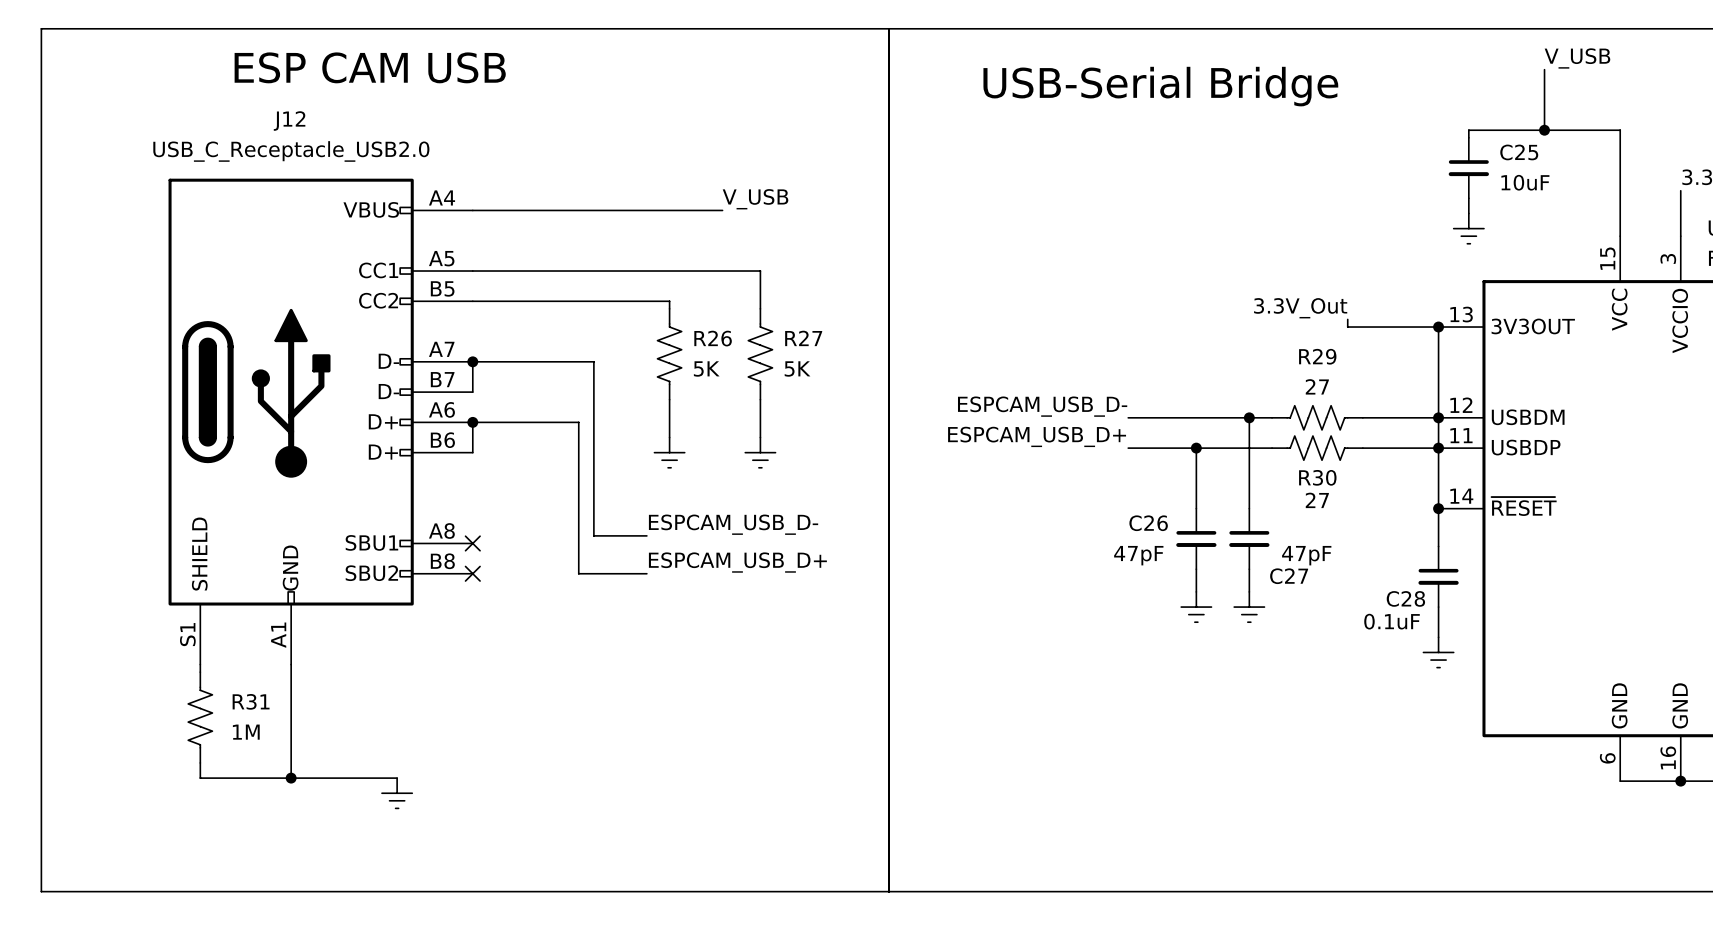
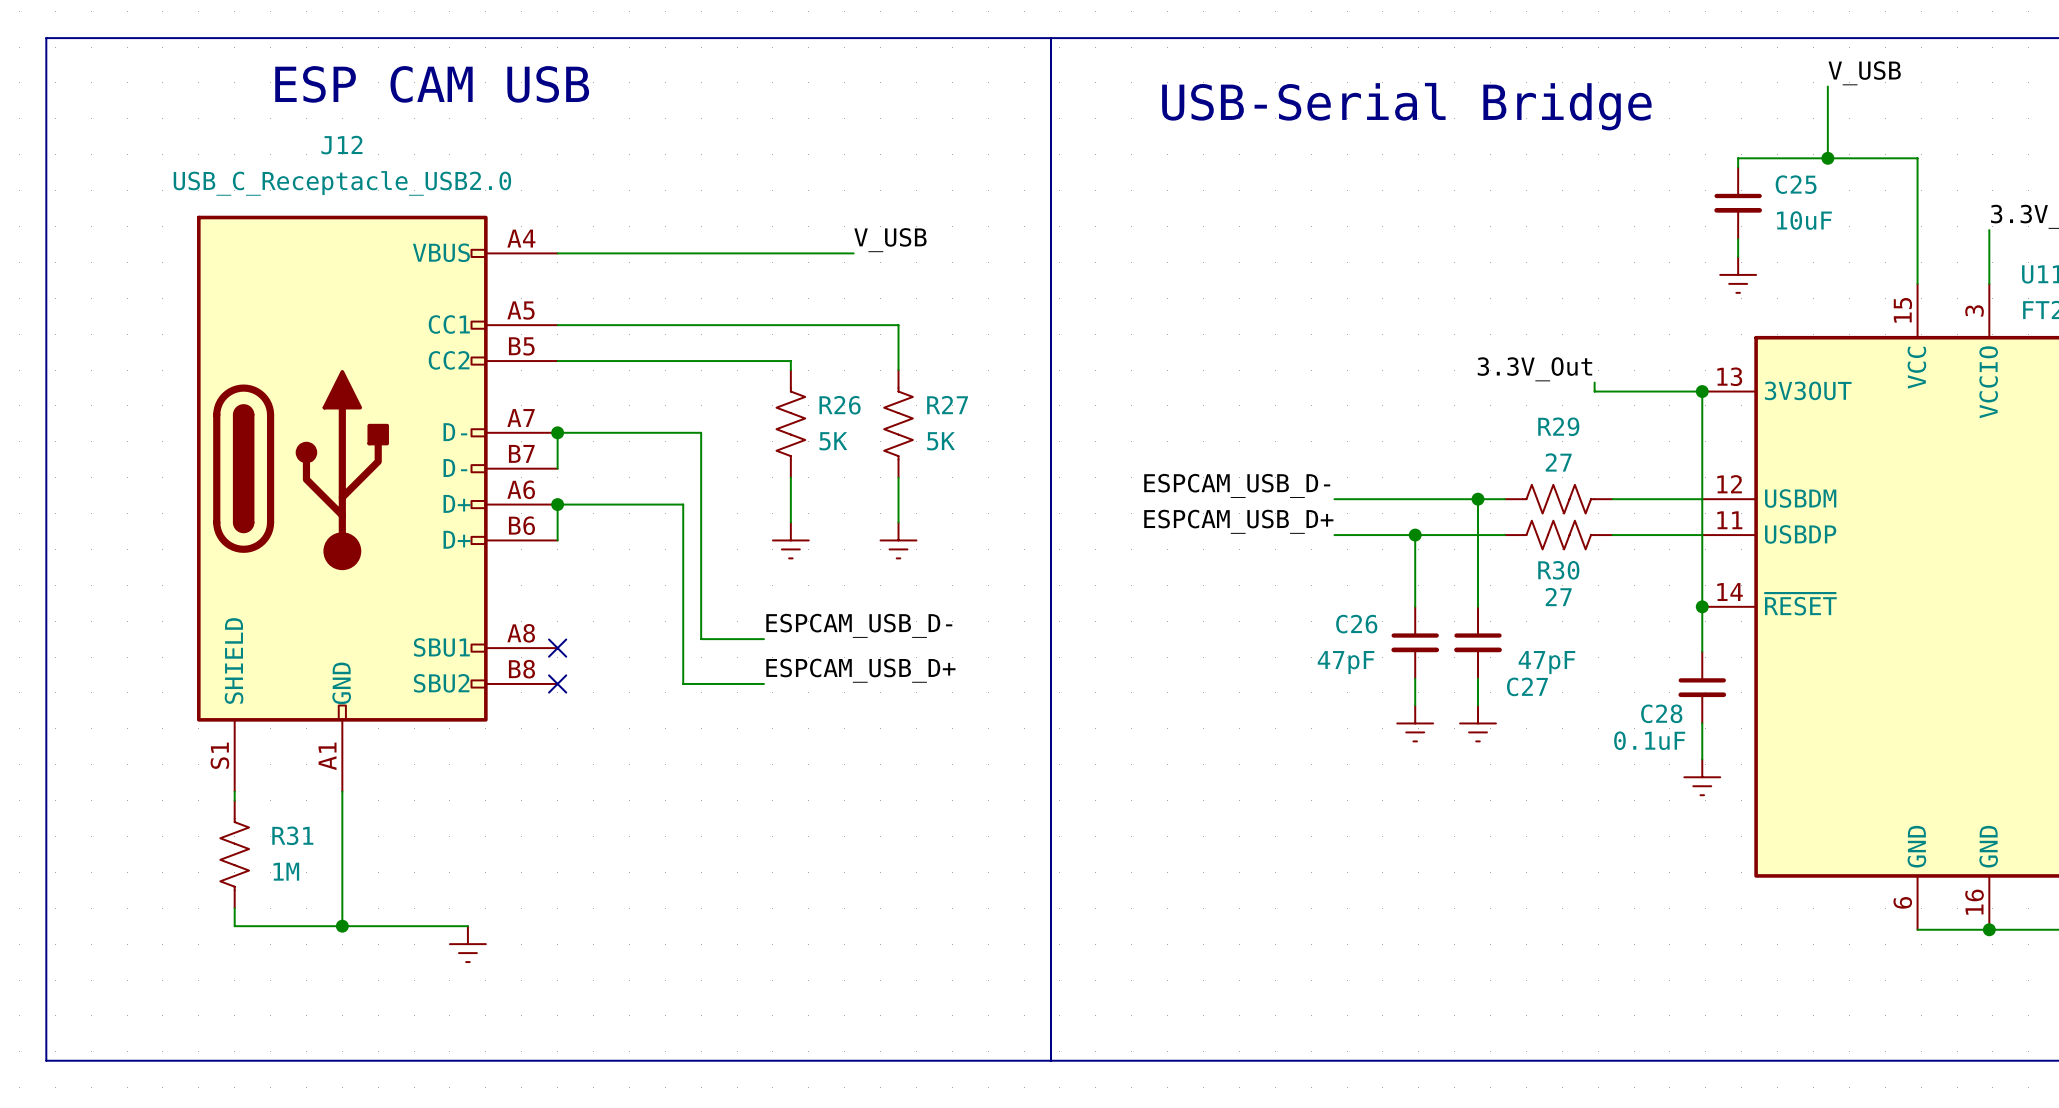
junction: (1438, 417) -> none
junction: (1438, 448) -> none

